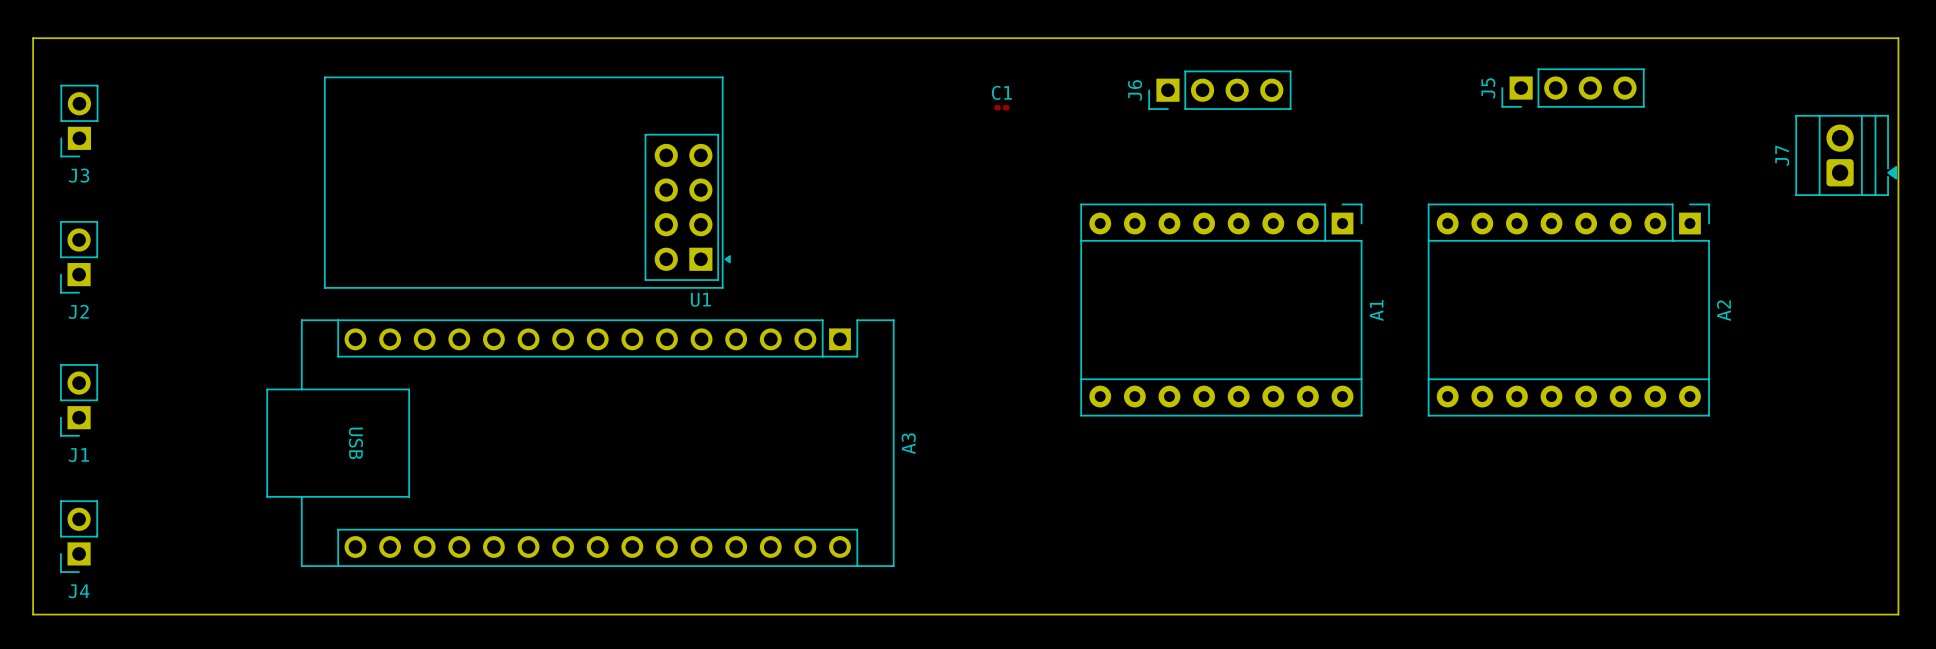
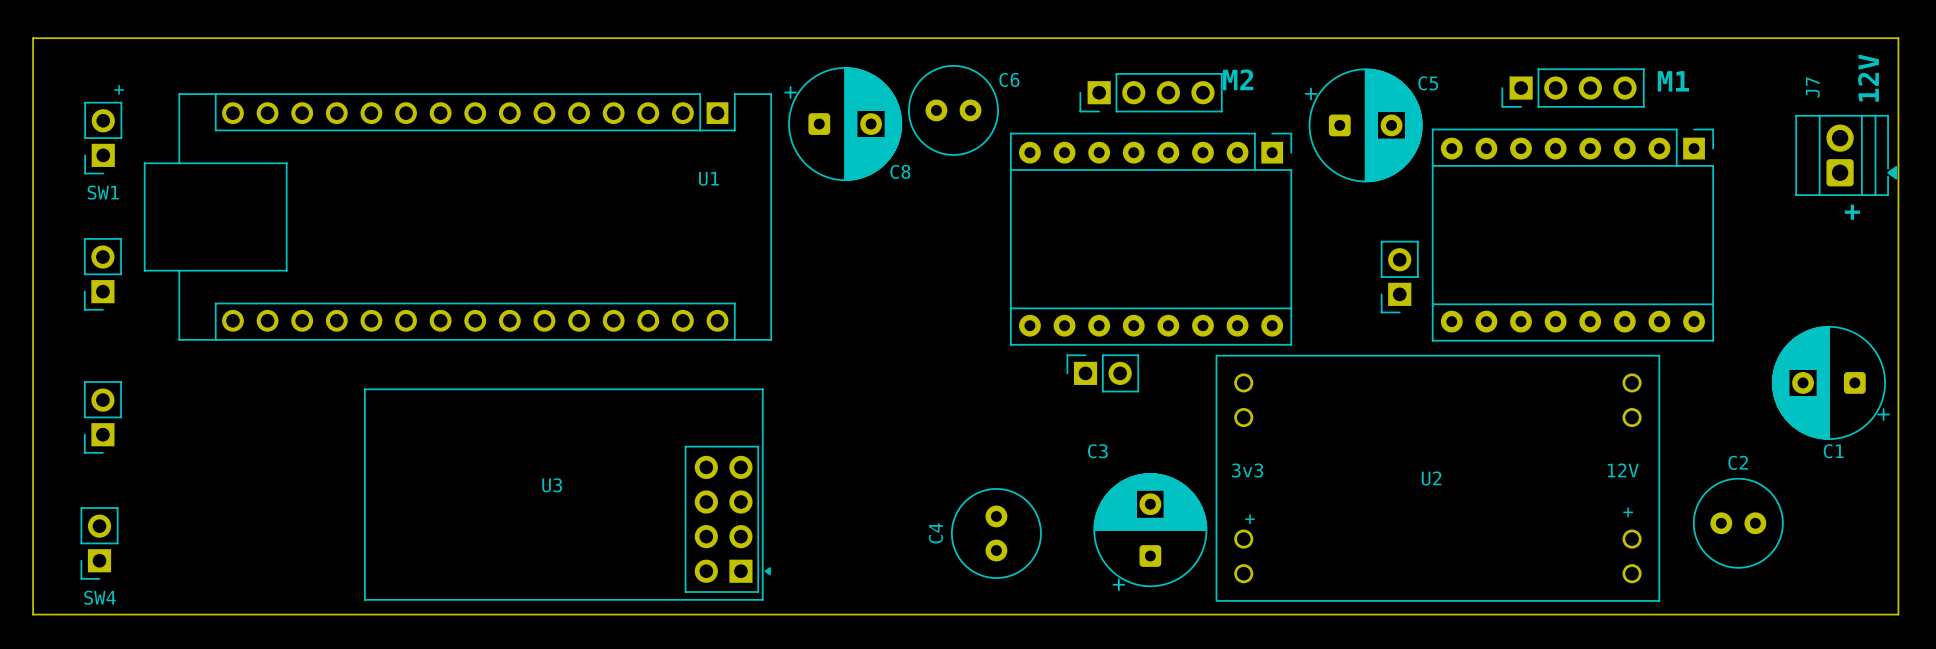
U1 footprint: [323, 76, 731, 289] -> [143, 93, 773, 341]
text: none -> 12V (1868, 78)
text: none -> M2 (1238, 79)
text: none -> M1 (1673, 81)
J5 name: J5 (1488, 88) -> none
text: none -> + (119, 89)
J6: (1219, 90) -> none
C1 name position: C1 (1001, 92) -> C1 (1833, 451)
part: none -> (1151, 92)
C1 footprint: [994, 104, 1010, 111] -> [1771, 325, 1890, 440]
C6: none -> (953, 110)
J3: (79, 121) -> none
C8: none -> (843, 124)
C5: none -> (1363, 125)
SW1: none -> (103, 138)
J7 name position: J7 (1782, 155) -> J7 (1812, 87)
text: none -> + (1852, 212)
part: none -> (1572, 235)
part: none -> (1151, 239)
J2: (79, 257) -> none
part: none -> (102, 274)
part: none -> (1399, 277)
U1 name position: U1 (700, 299) -> U1 (708, 178)
A1: (1221, 310) -> none
A2: (1568, 310) -> none
part: none -> (1102, 373)
J1: (79, 400) -> none
part: none -> (102, 417)
A3: (580, 443) -> none
text: none -> 3v3 (1247, 470)
text: none -> 12V (1623, 470)
U2: none -> (1437, 478)
U3: none -> (567, 494)
text: none -> + (1628, 512)
text: none -> + (1250, 519)
C2: none -> (1738, 523)
C3: none -> (1150, 532)
C4: none -> (996, 533)
J4: (79, 536) -> none
SW4: none -> (99, 543)

